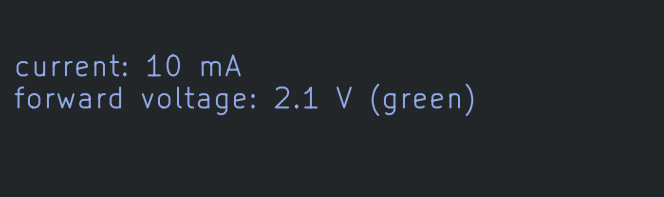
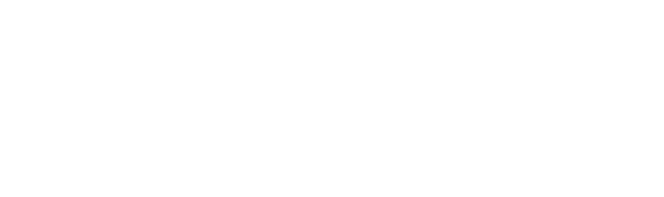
text: current: 10 mA (128, 65) -> none
text: forward voltage: 2.1 V (green) (243, 99) -> none

